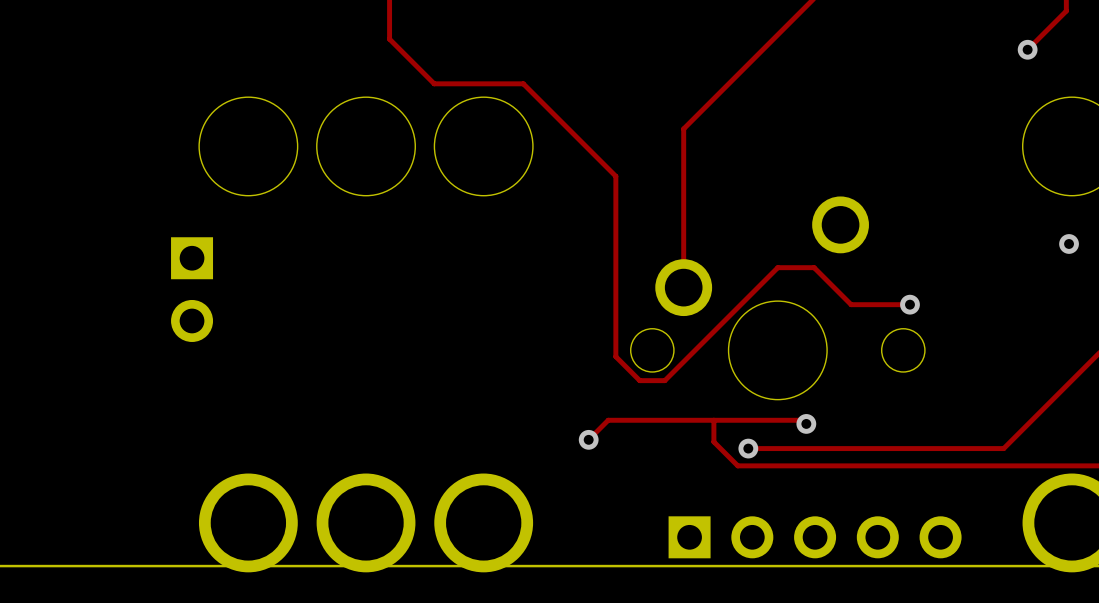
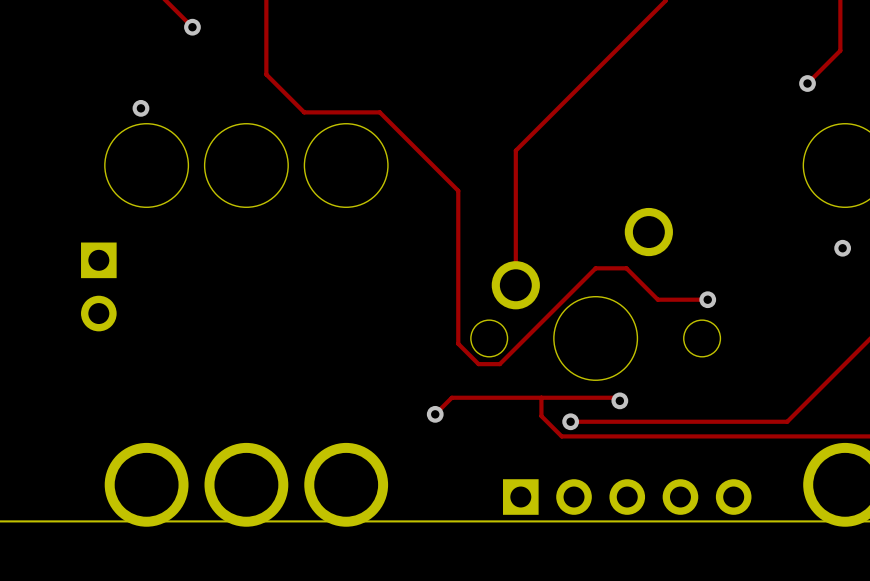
via: none -> (140, 108)

